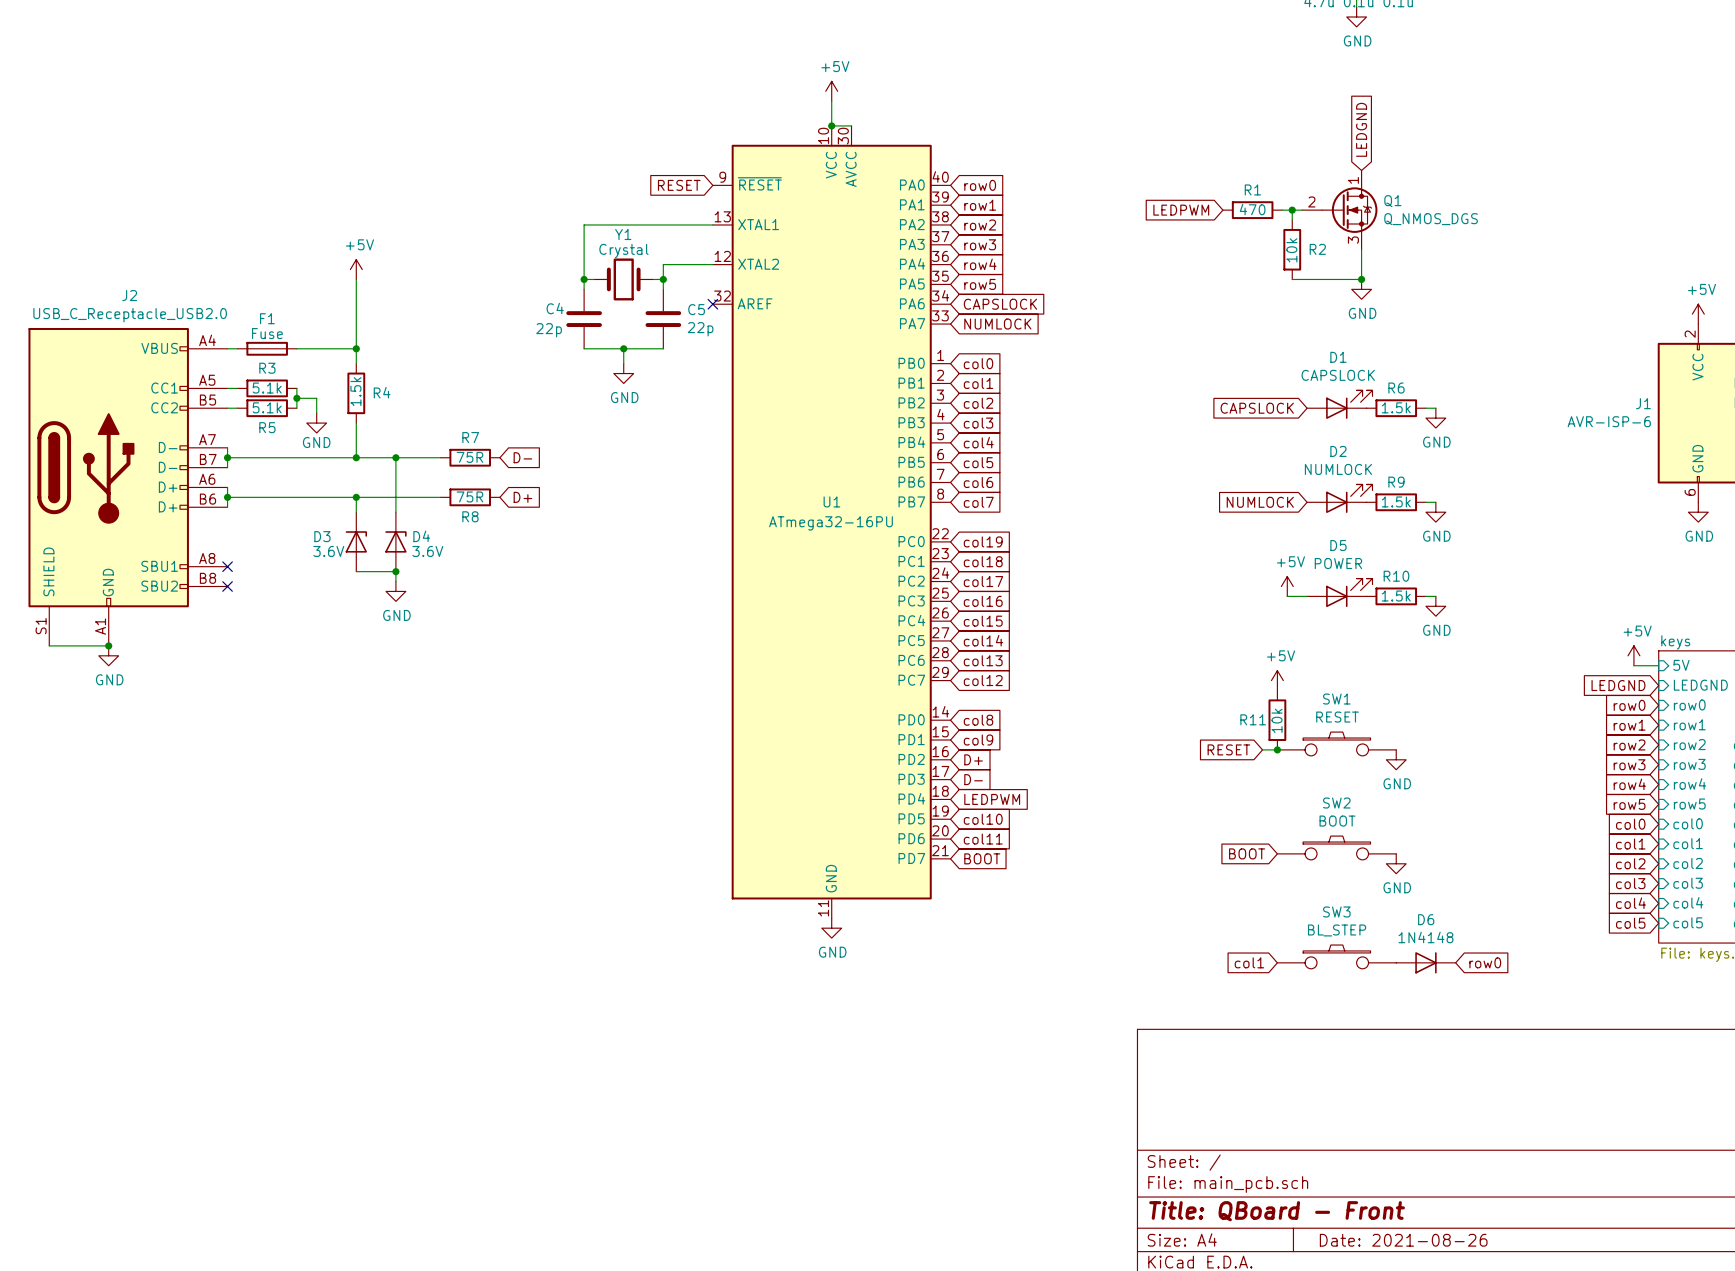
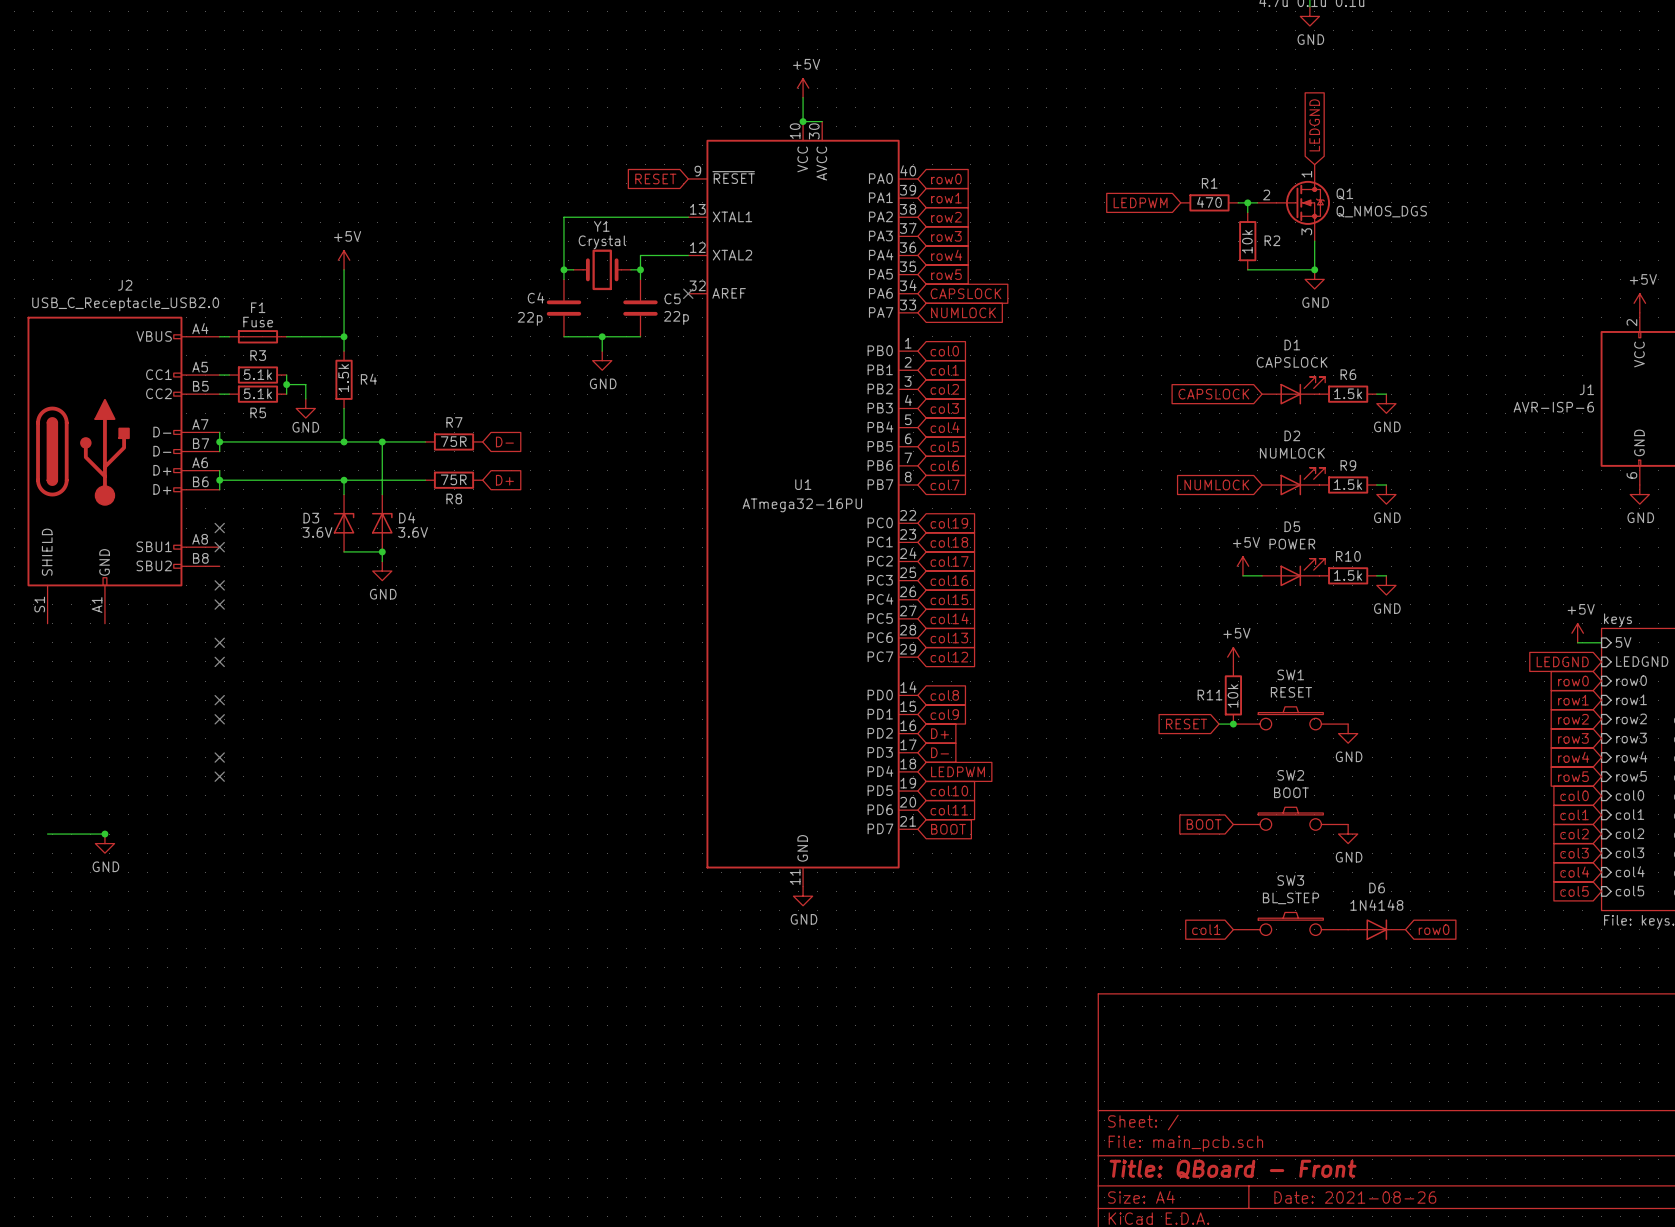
no-connect mark: none -> (219, 528)
no-connect mark: (227, 586) -> none
no-connect mark: none -> (219, 585)
no-connect mark: none -> (219, 604)
wire: (49, 645) (108, 645) -> none
junction: (108, 645) -> none
power symbol: GND (108, 655) -> none
no-connect mark: none -> (219, 642)
no-connect mark: none -> (219, 661)
no-connect mark: none -> (219, 700)
no-connect mark: none -> (219, 719)
no-connect mark: none -> (219, 757)
no-connect mark: none -> (219, 776)
wire: none -> (47, 834) (104, 834)
junction: none -> (104, 834)
power symbol: none -> GND (104, 843)

